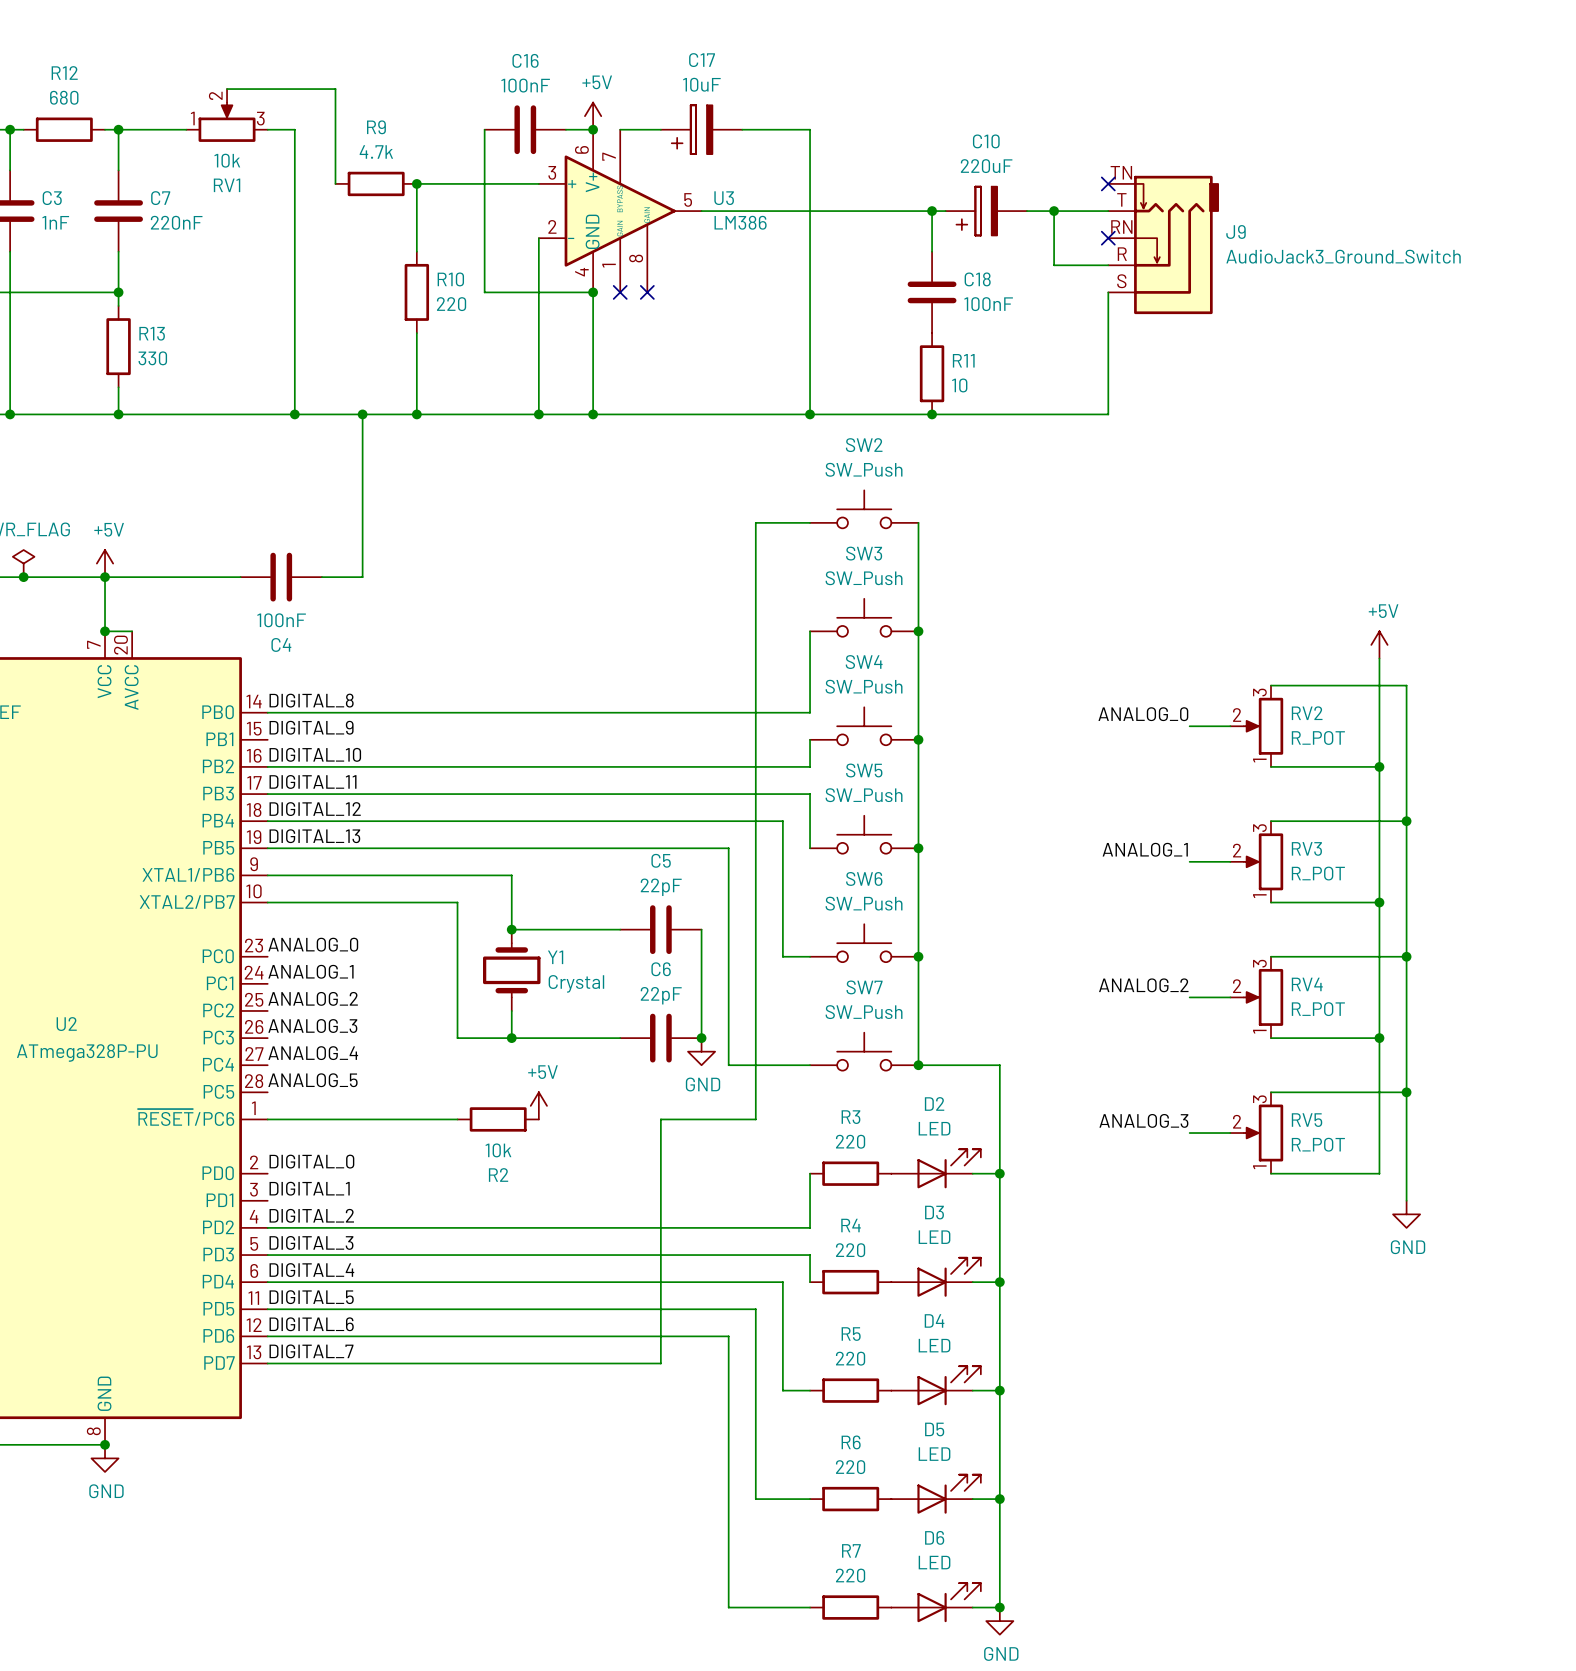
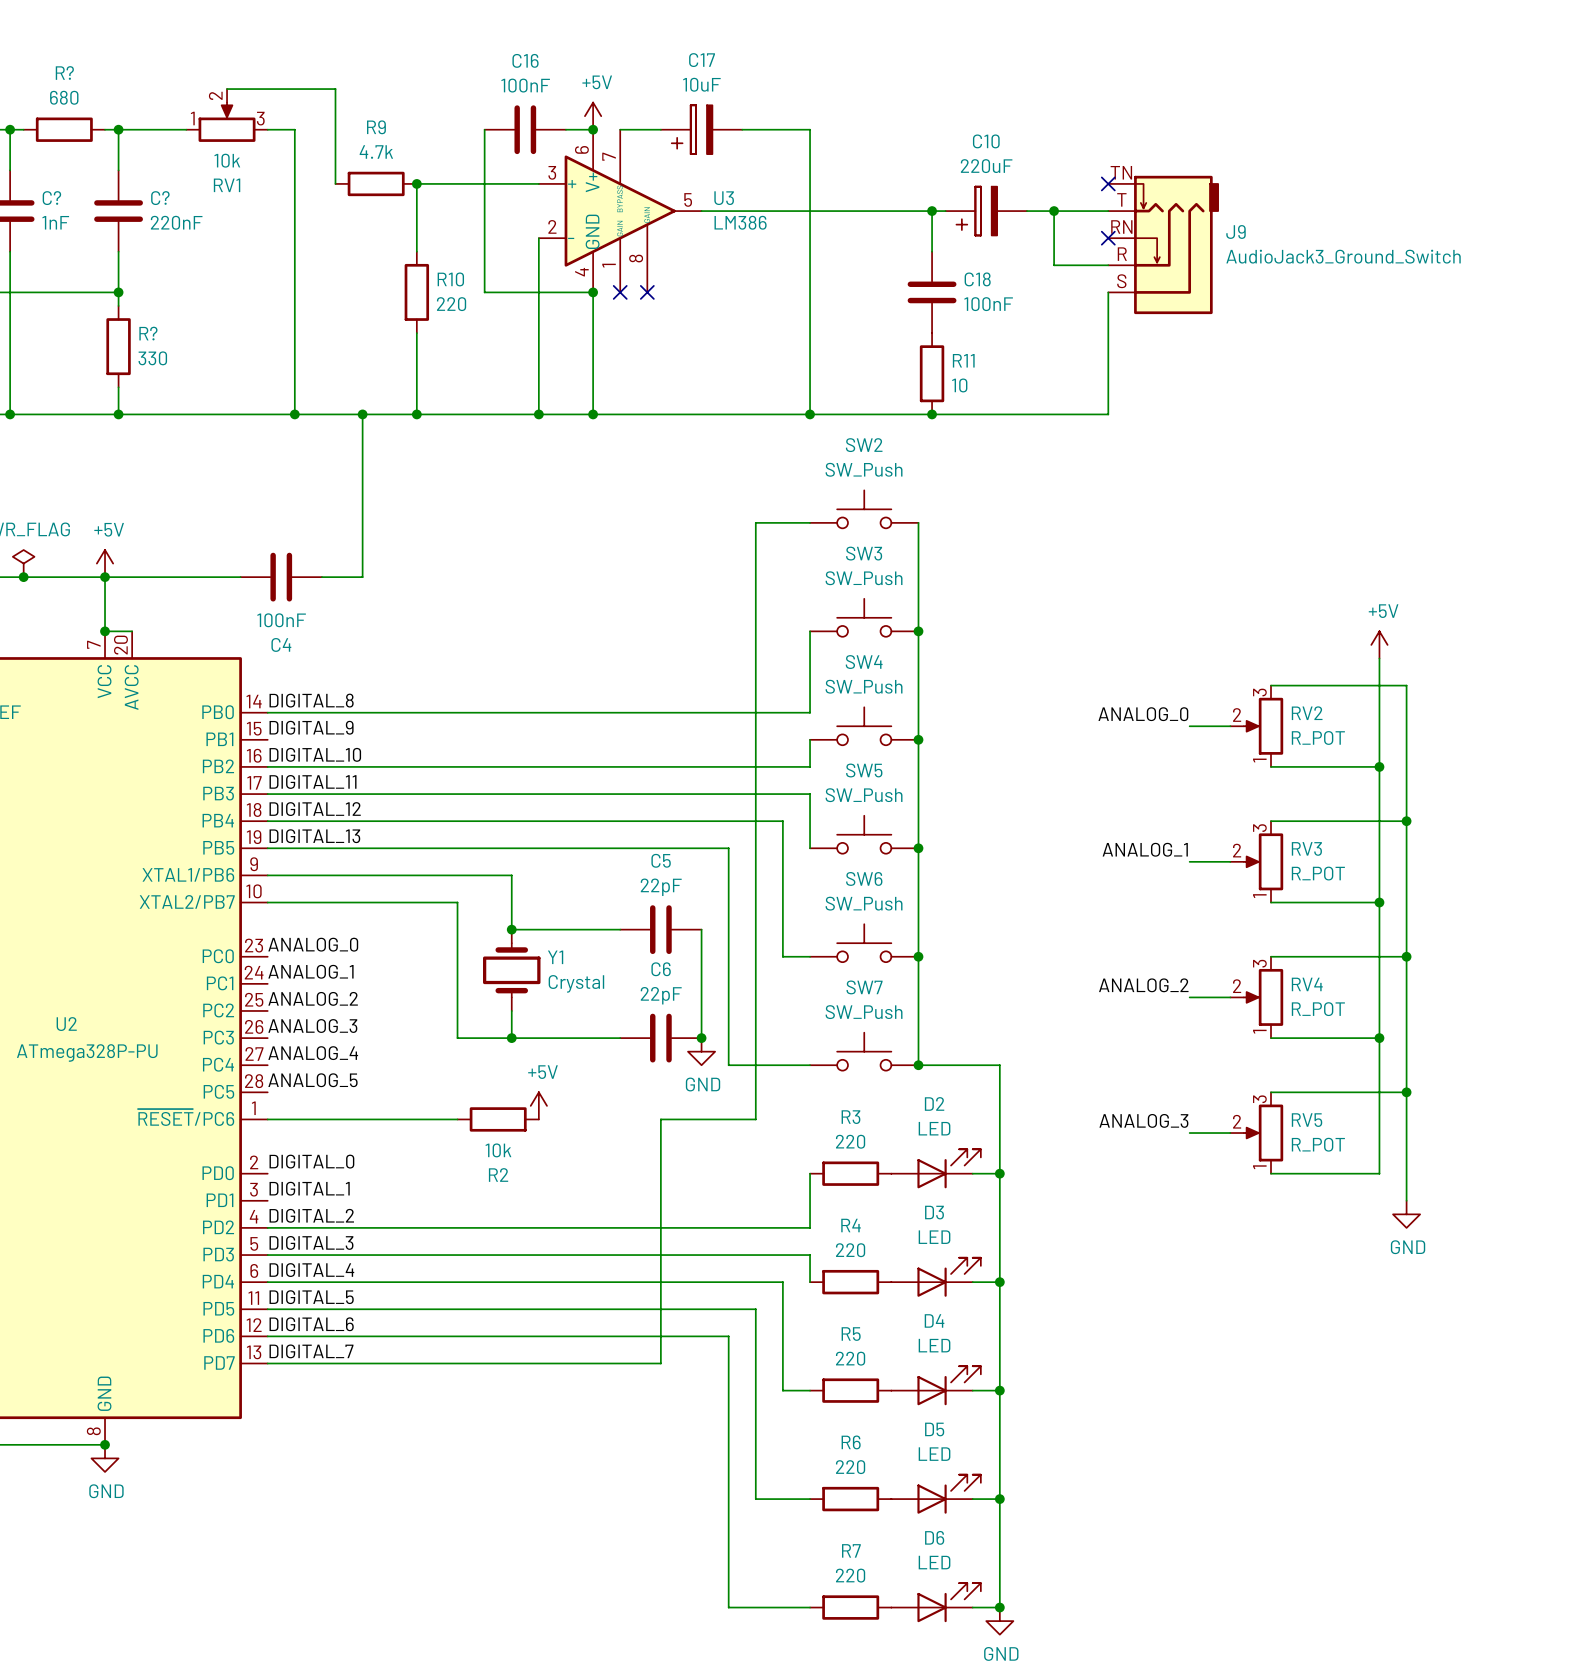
R12 name: R12 (64, 73) -> R? (64, 72)
C3 name: C3 (52, 198) -> C? (51, 198)
C7 name: C7 (160, 198) -> C? (160, 198)
R13 name: R13 (152, 333) -> R? (148, 333)

